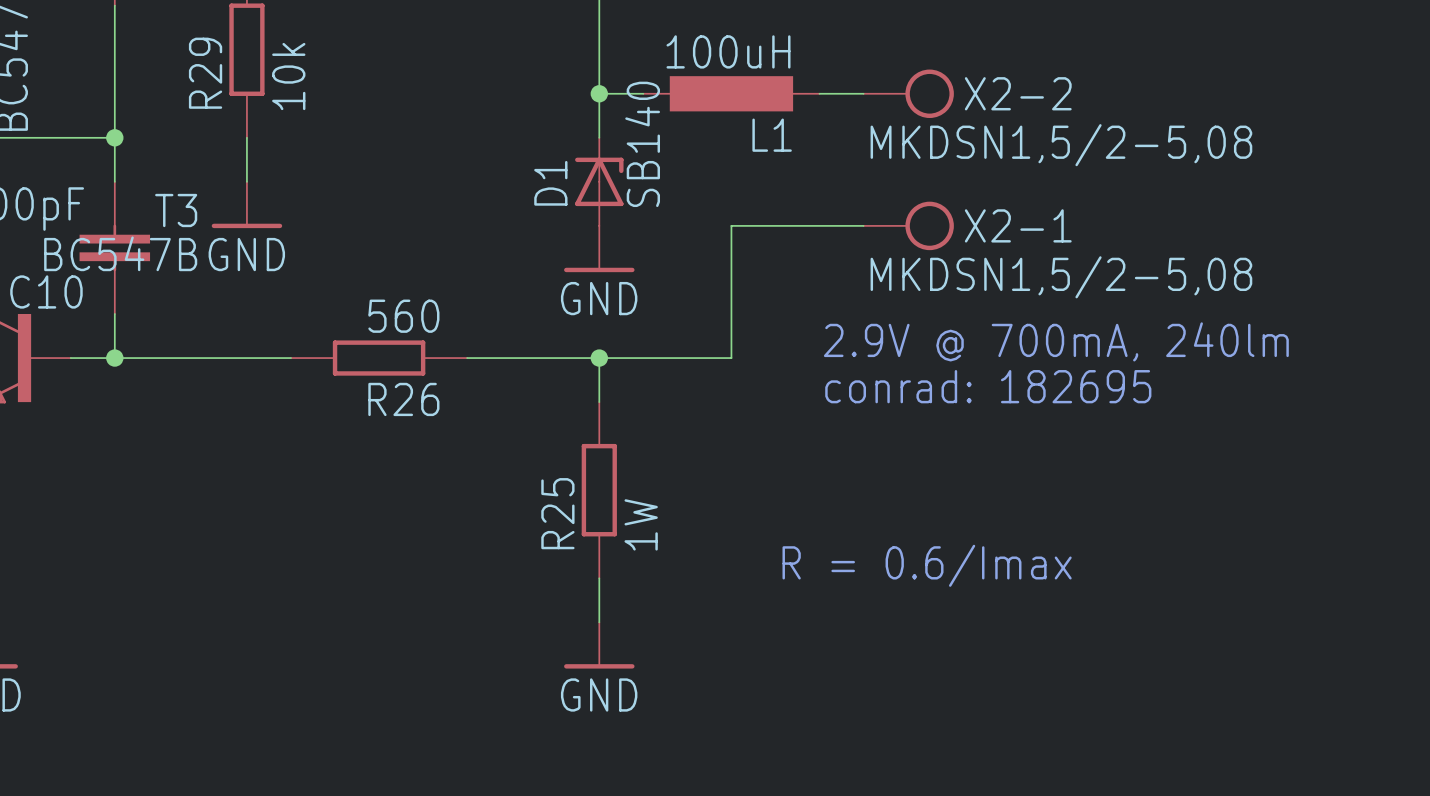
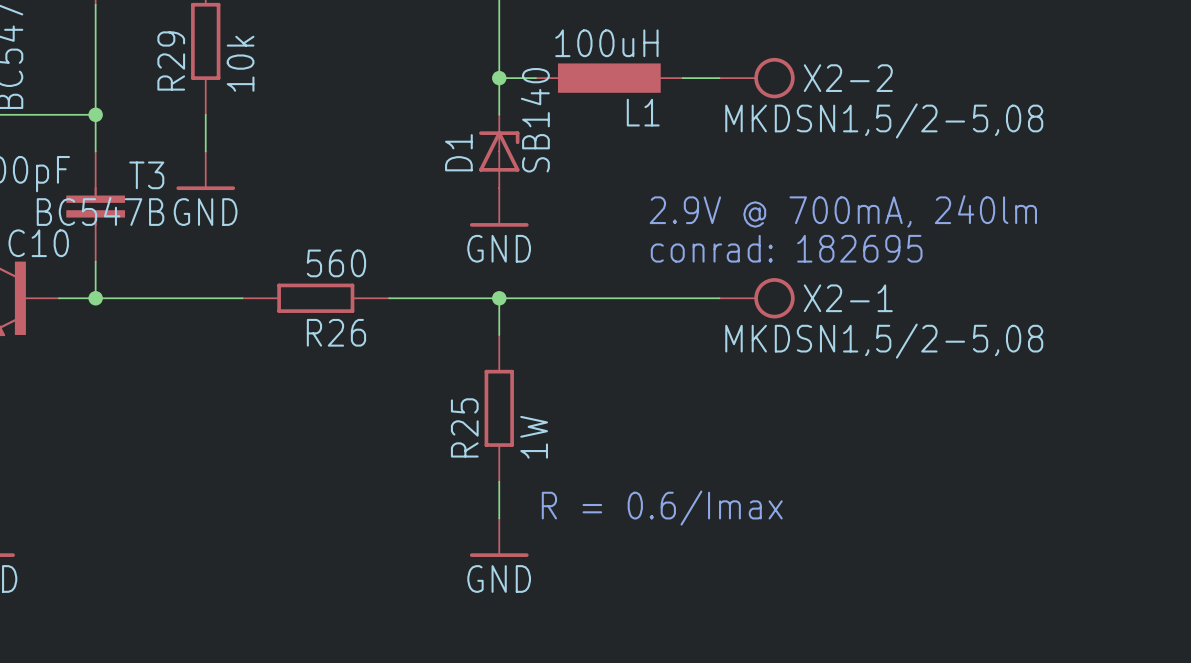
wire: (863, 225) (731, 225) (731, 358) -> (719, 298) (609, 298)
X2-1 position: (908, 225) -> (757, 298)
text position: 2.9V @ 700mA, 240lm (1056, 341) -> 2.9V @ 700mA, 240lm (843, 211)
text position: conrad: 182695 (988, 386) -> conrad: 182695 (786, 248)
text position: R = 0.6/Imax (927, 565) -> R = 0.6/Imax (662, 508)

